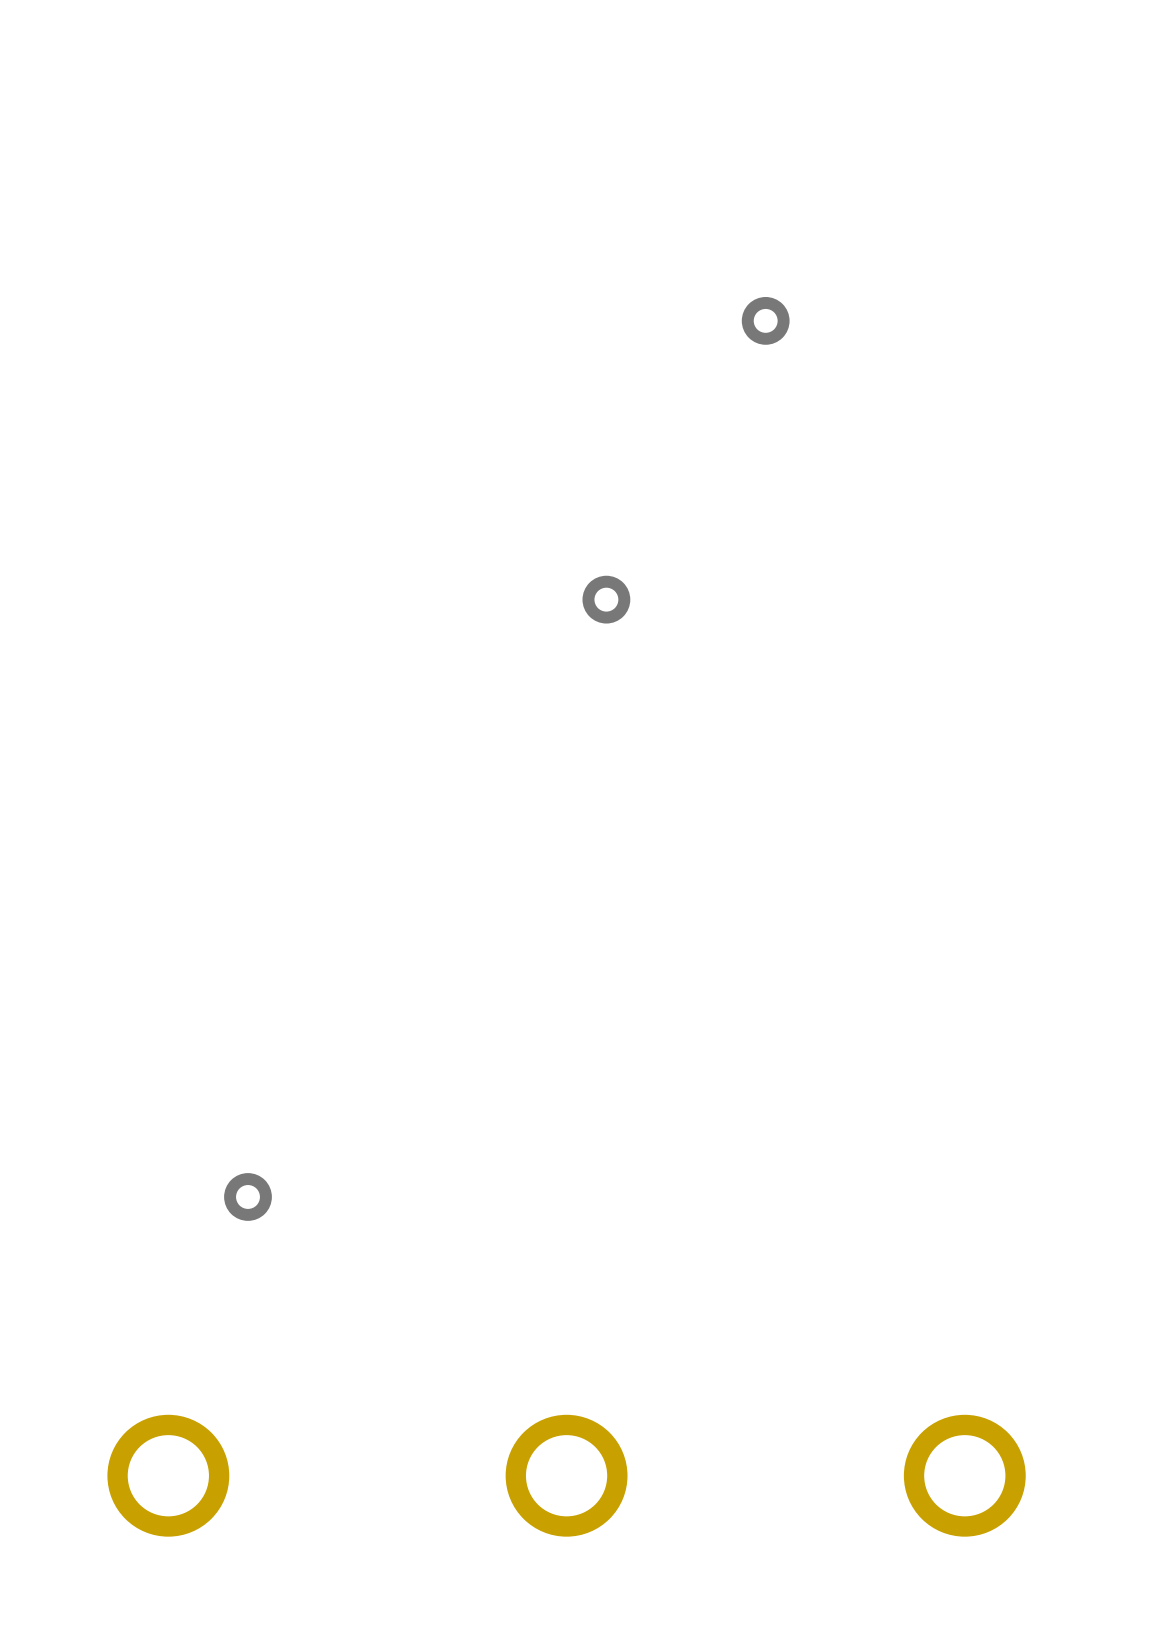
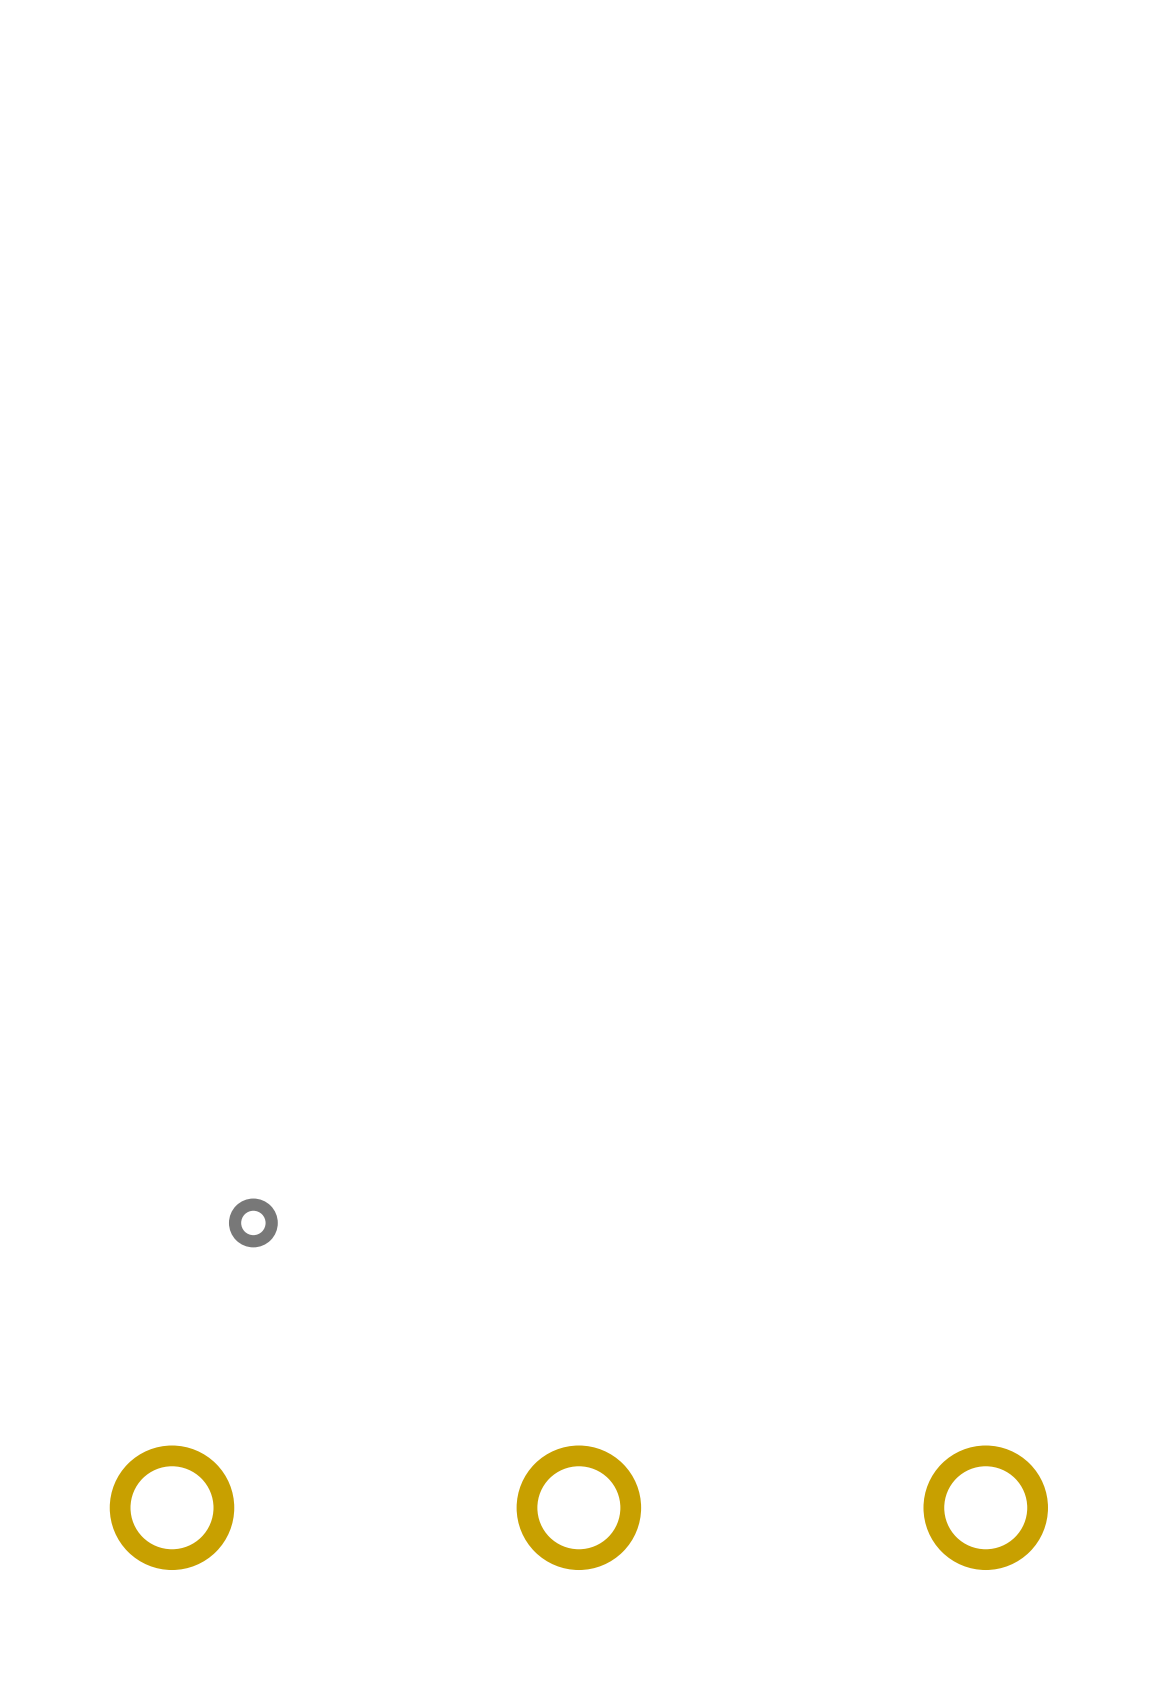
via: (765, 320) -> none
via: (606, 599) -> none

